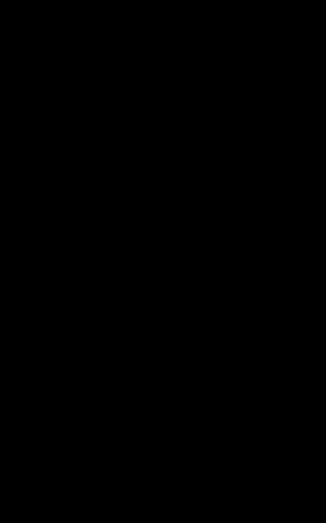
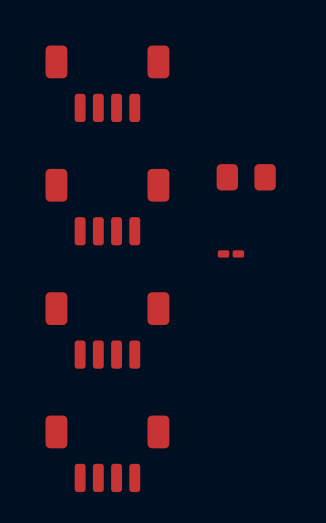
part: none -> (107, 83)
part: none -> (246, 177)
part: none -> (107, 207)
part: none -> (230, 253)
part: none -> (107, 330)
part: none -> (107, 453)

